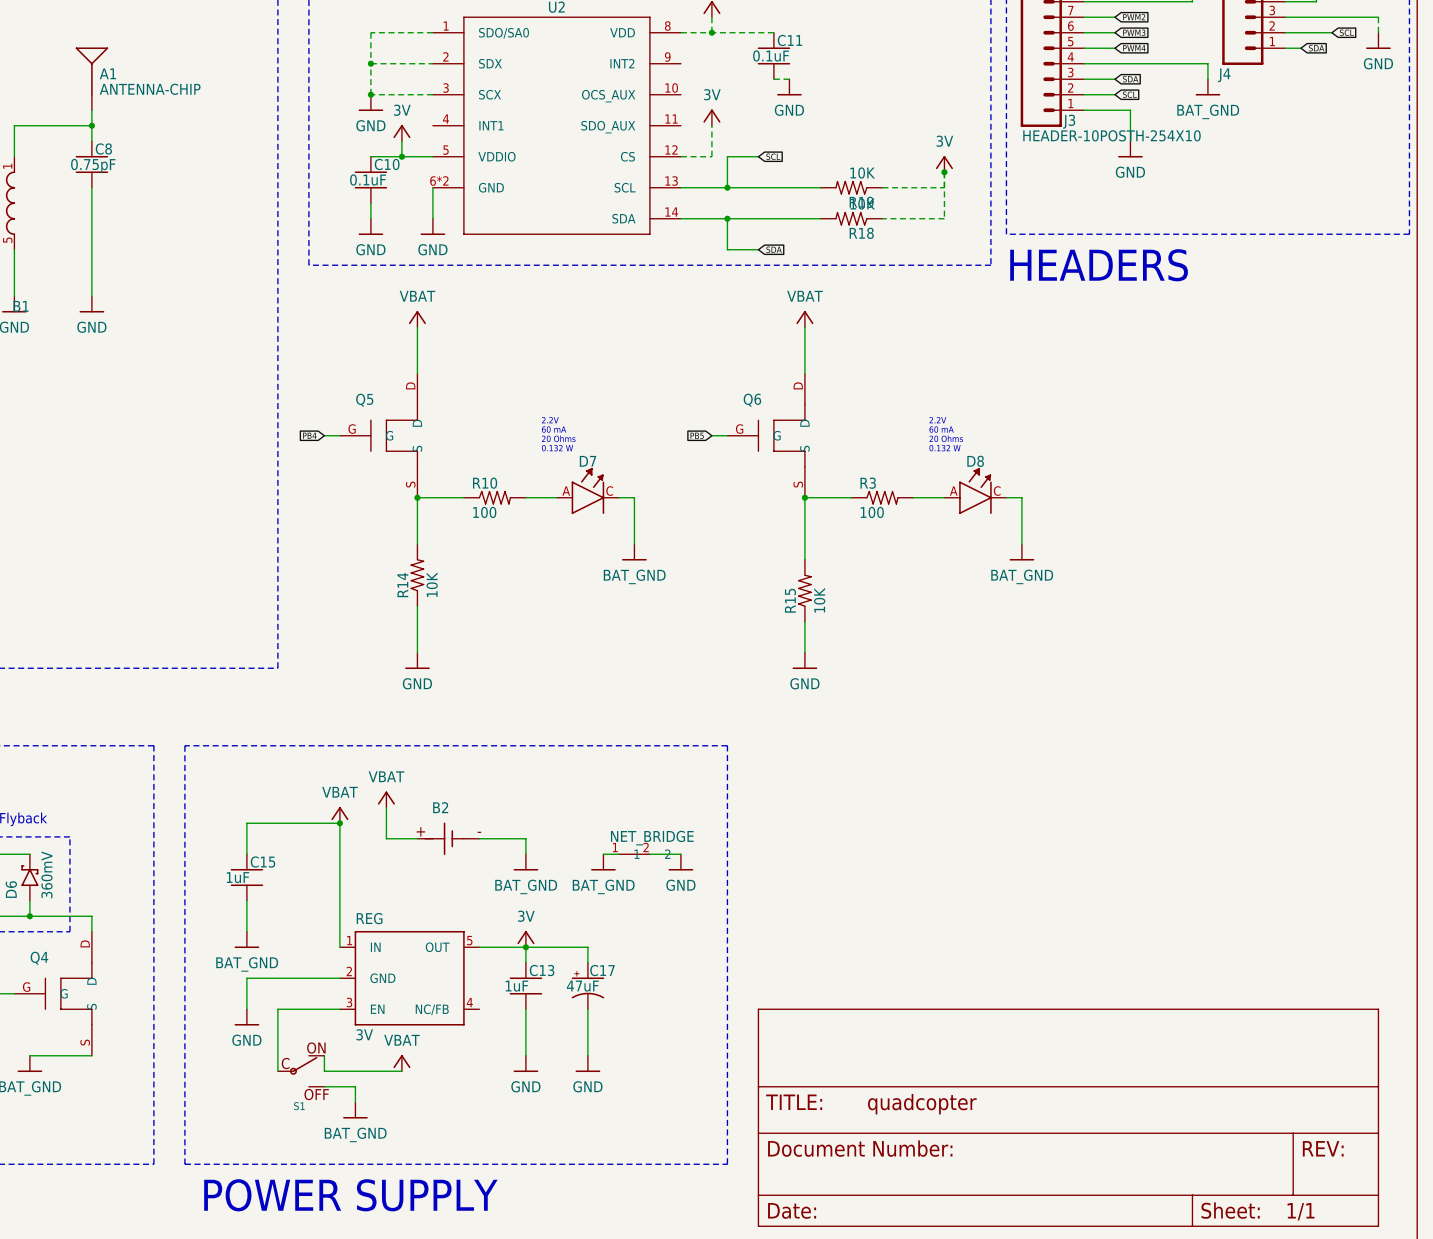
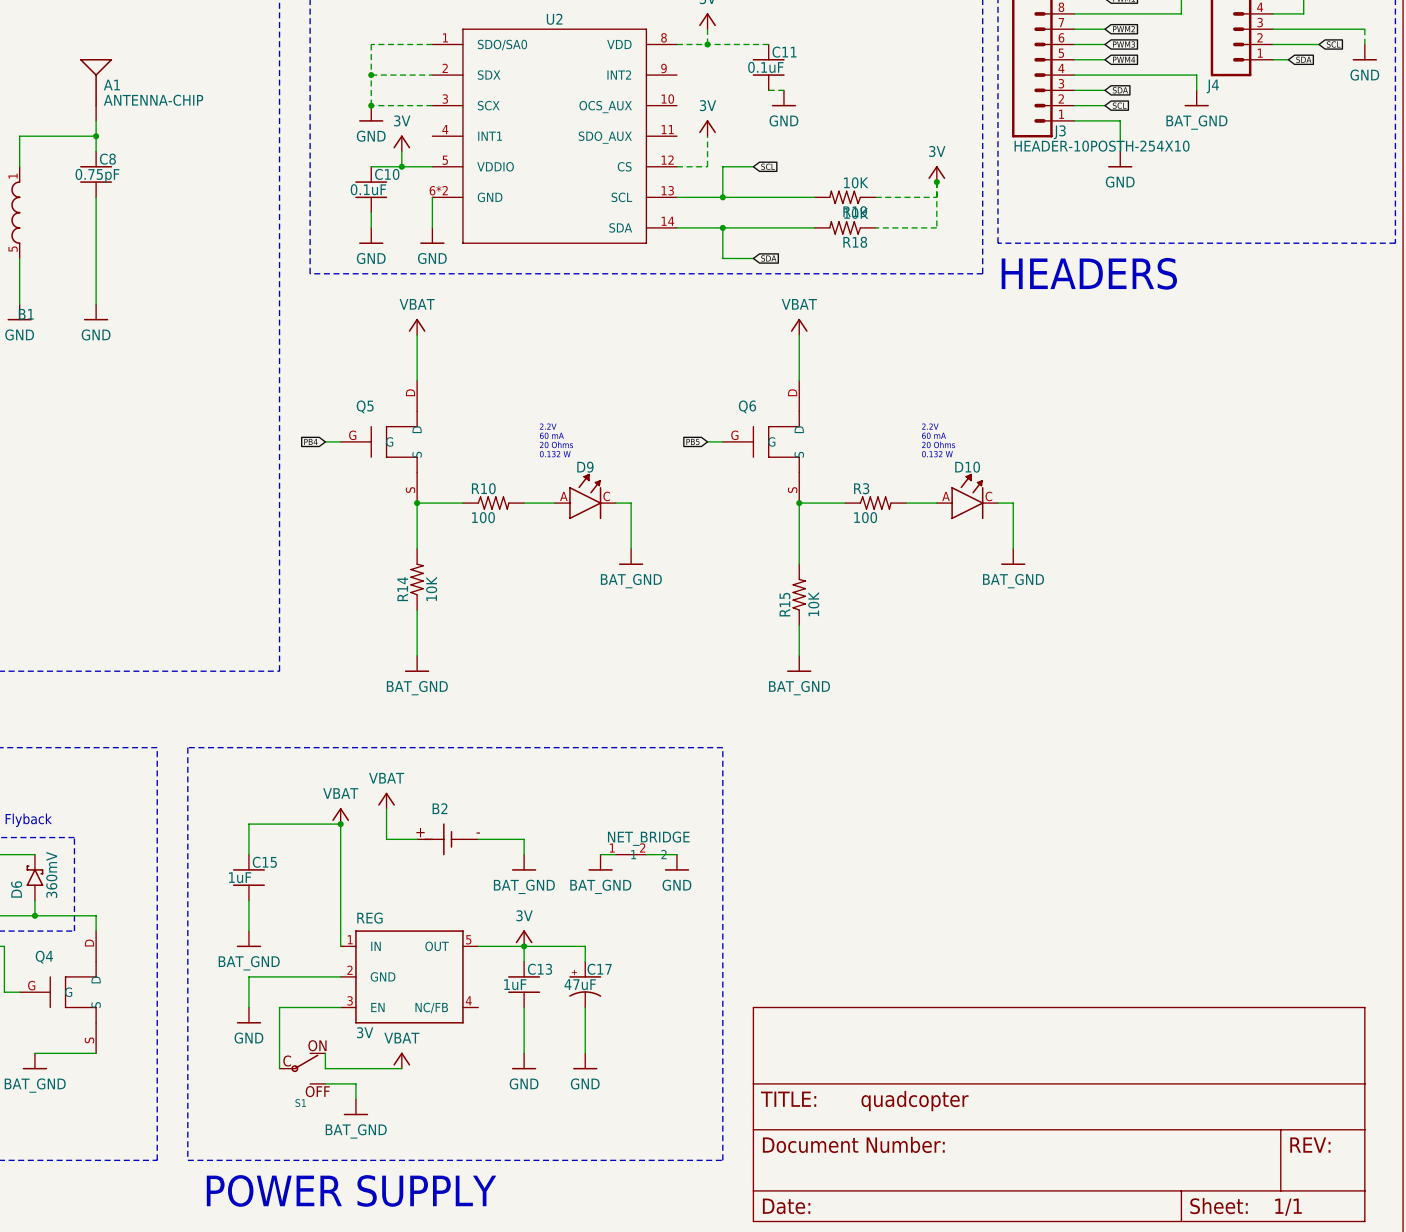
D7 name: D7 (588, 461) -> D9 (585, 467)
D8 name: D8 (975, 461) -> D10 (967, 467)
power symbol: GND (417, 660) -> BAT_GND (417, 663)
power symbol: GND (804, 660) -> BAT_GND (799, 663)

